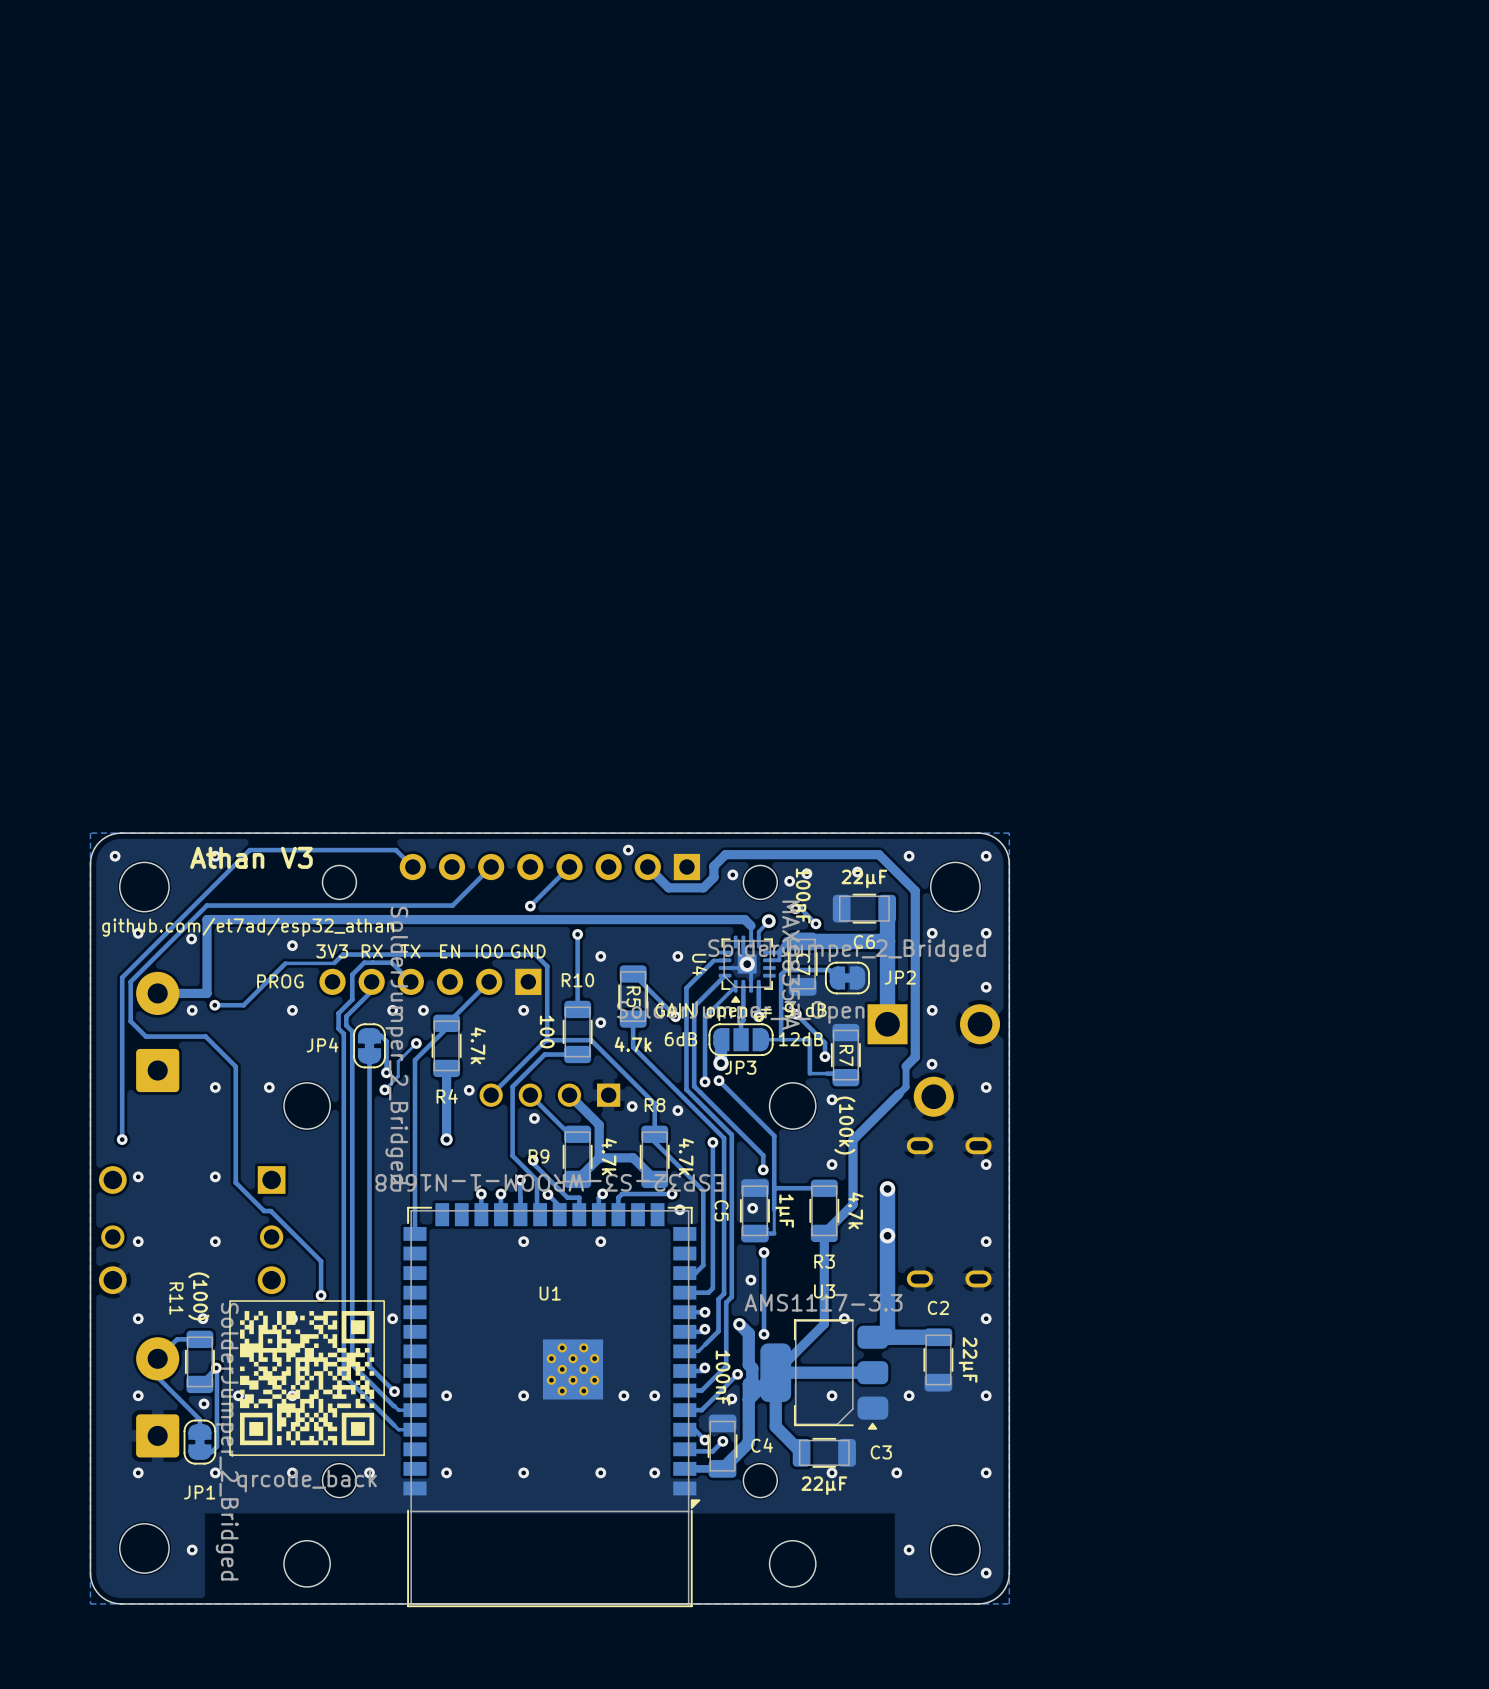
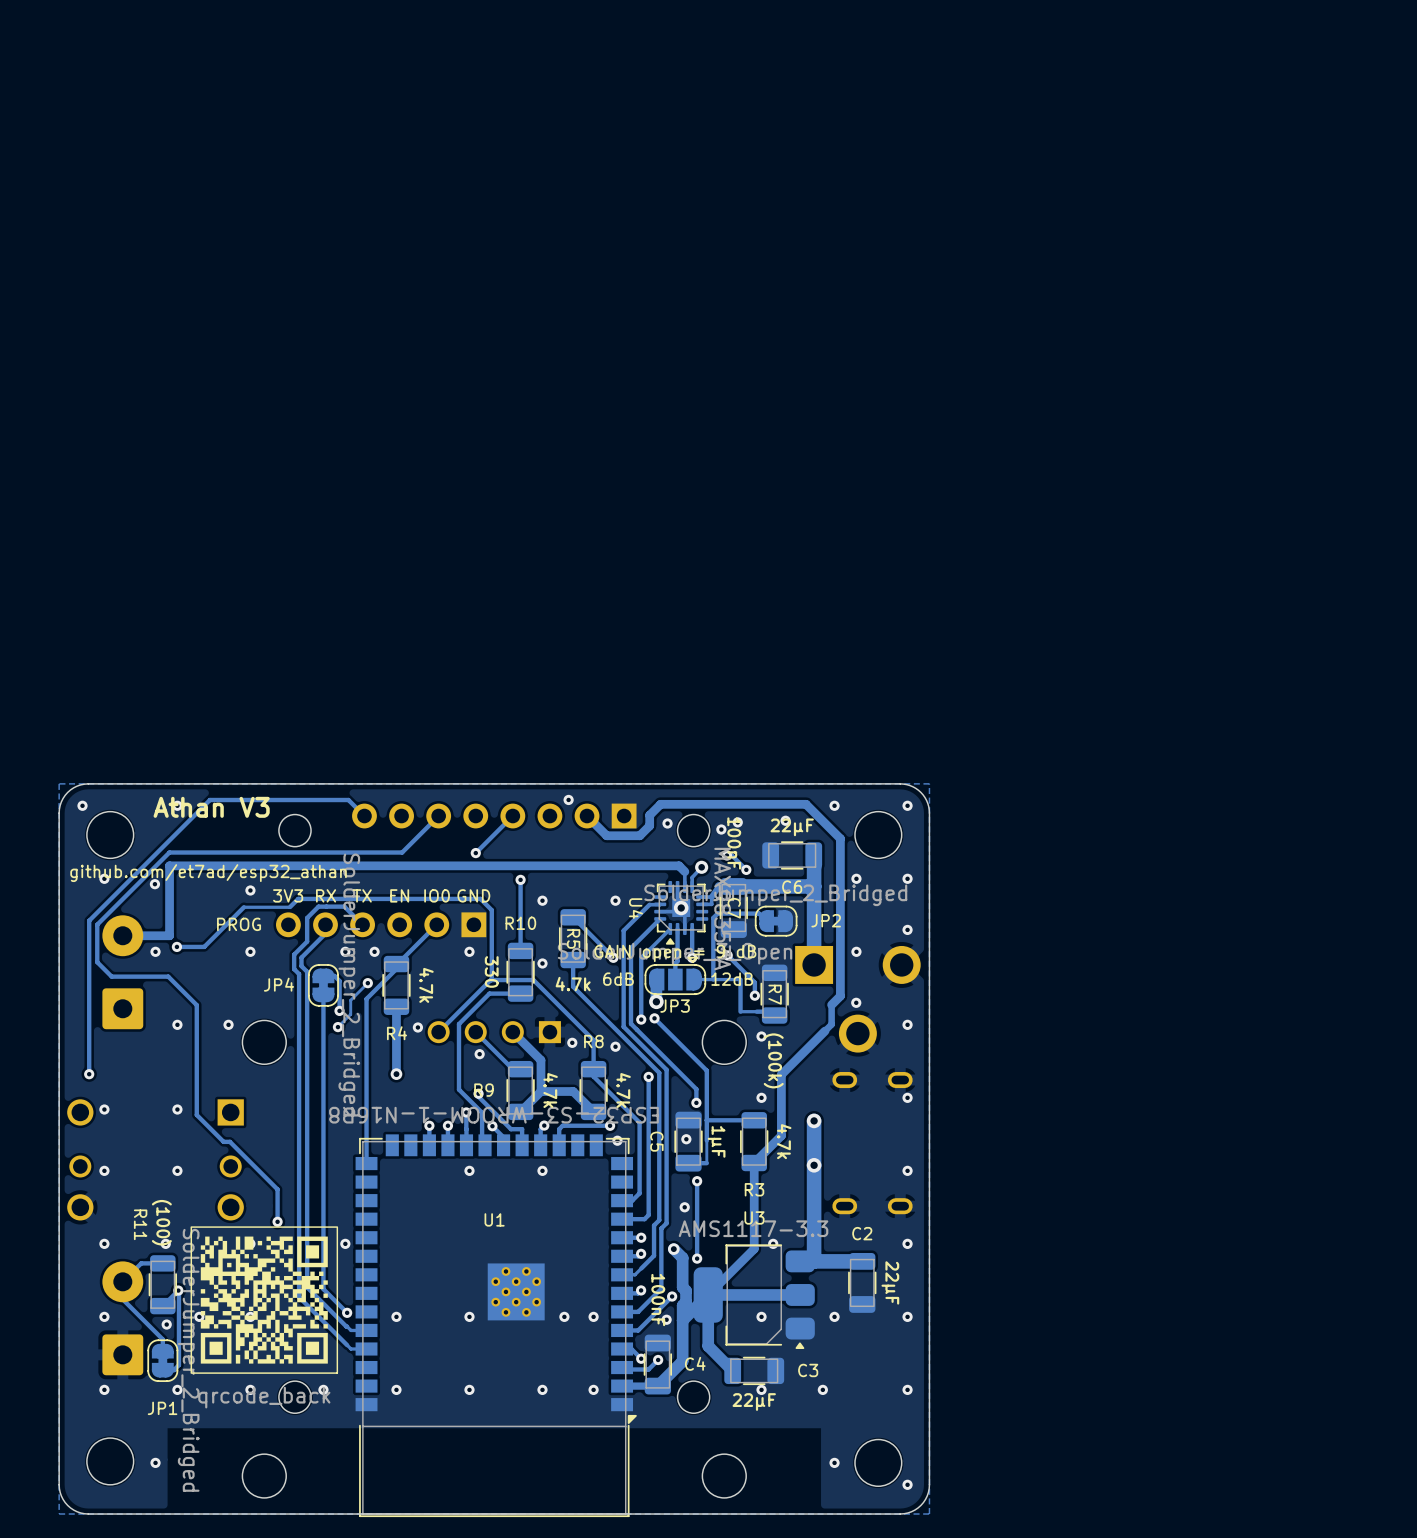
R10 value: 100 (547, 1031) -> 330 (491, 971)

